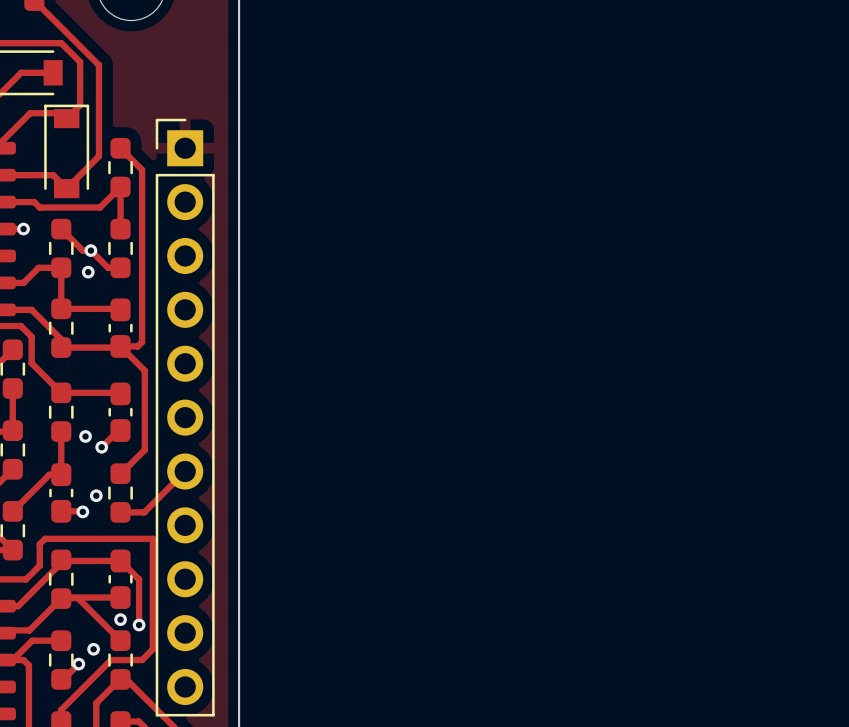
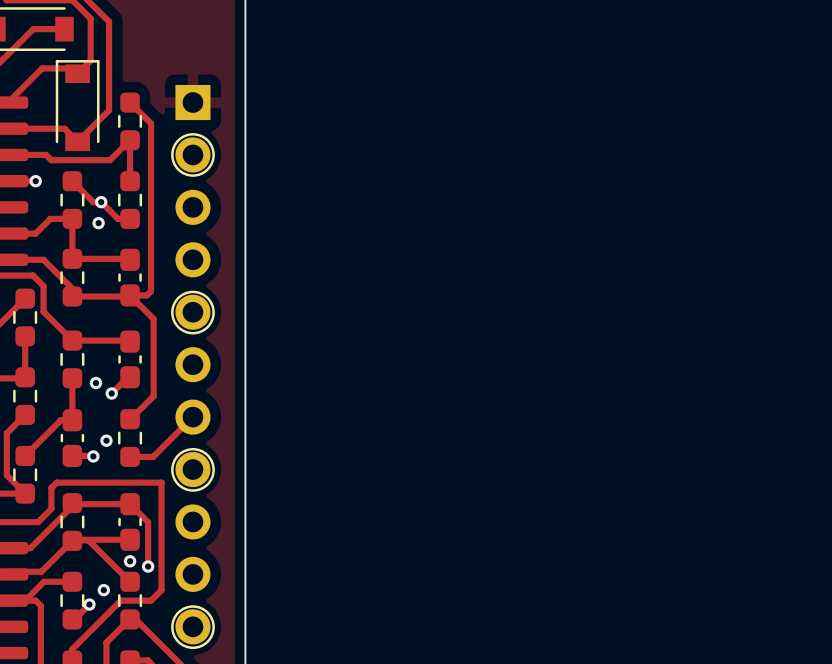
drawing: none -> [171, 133, 215, 177]
drawing: none -> [171, 290, 215, 335]
part side: top (185, 417) -> bottom (192, 364)
drawing: none -> [171, 447, 215, 492]
drawing: none -> [171, 605, 215, 650]

